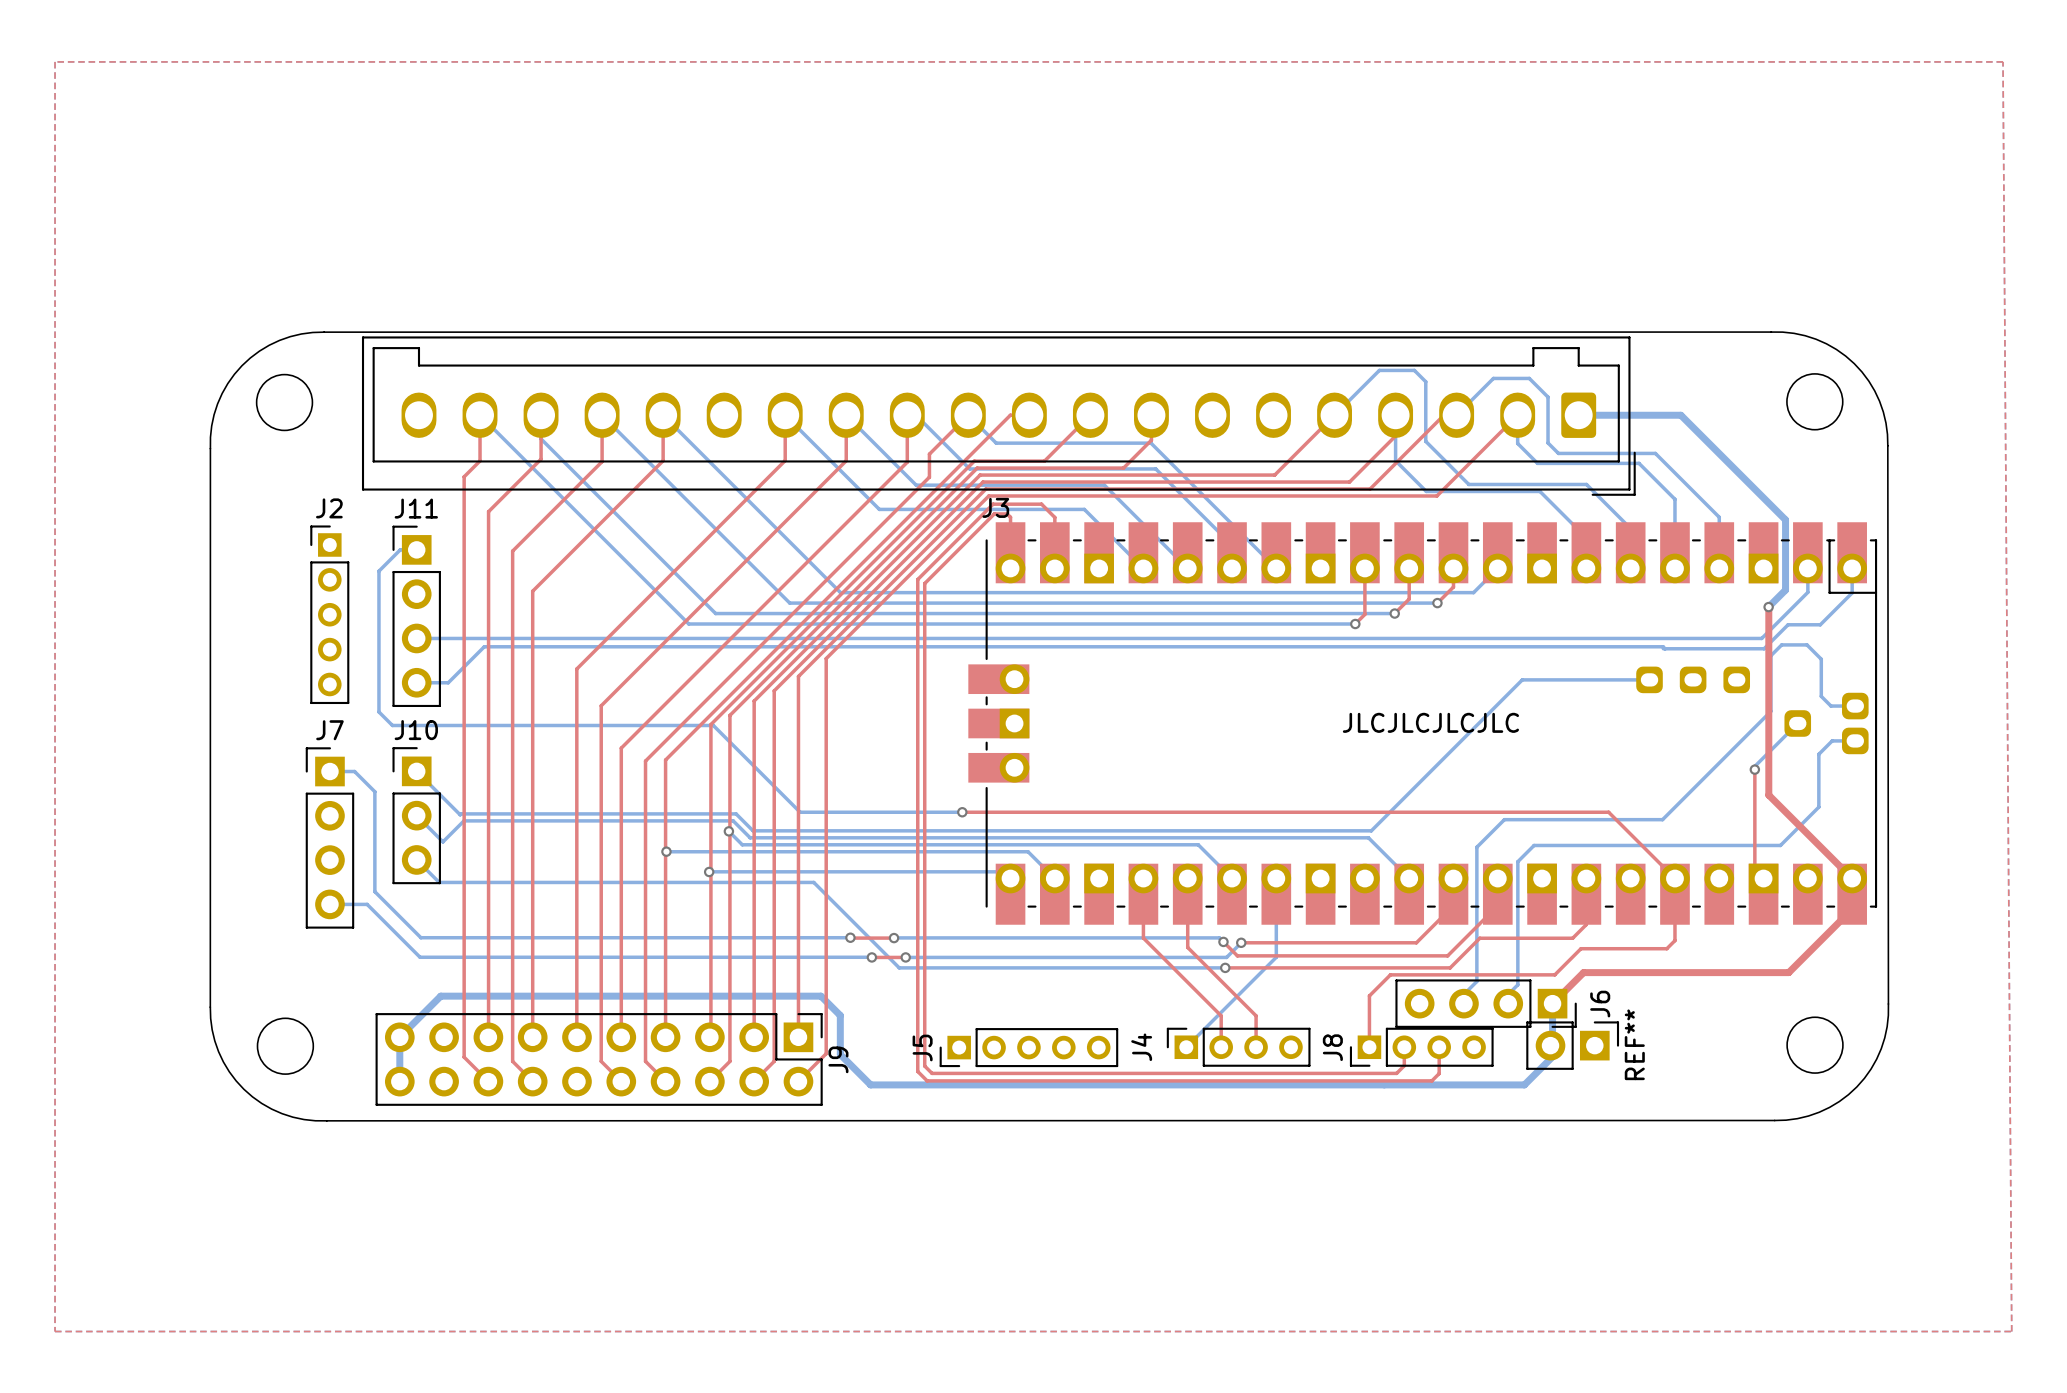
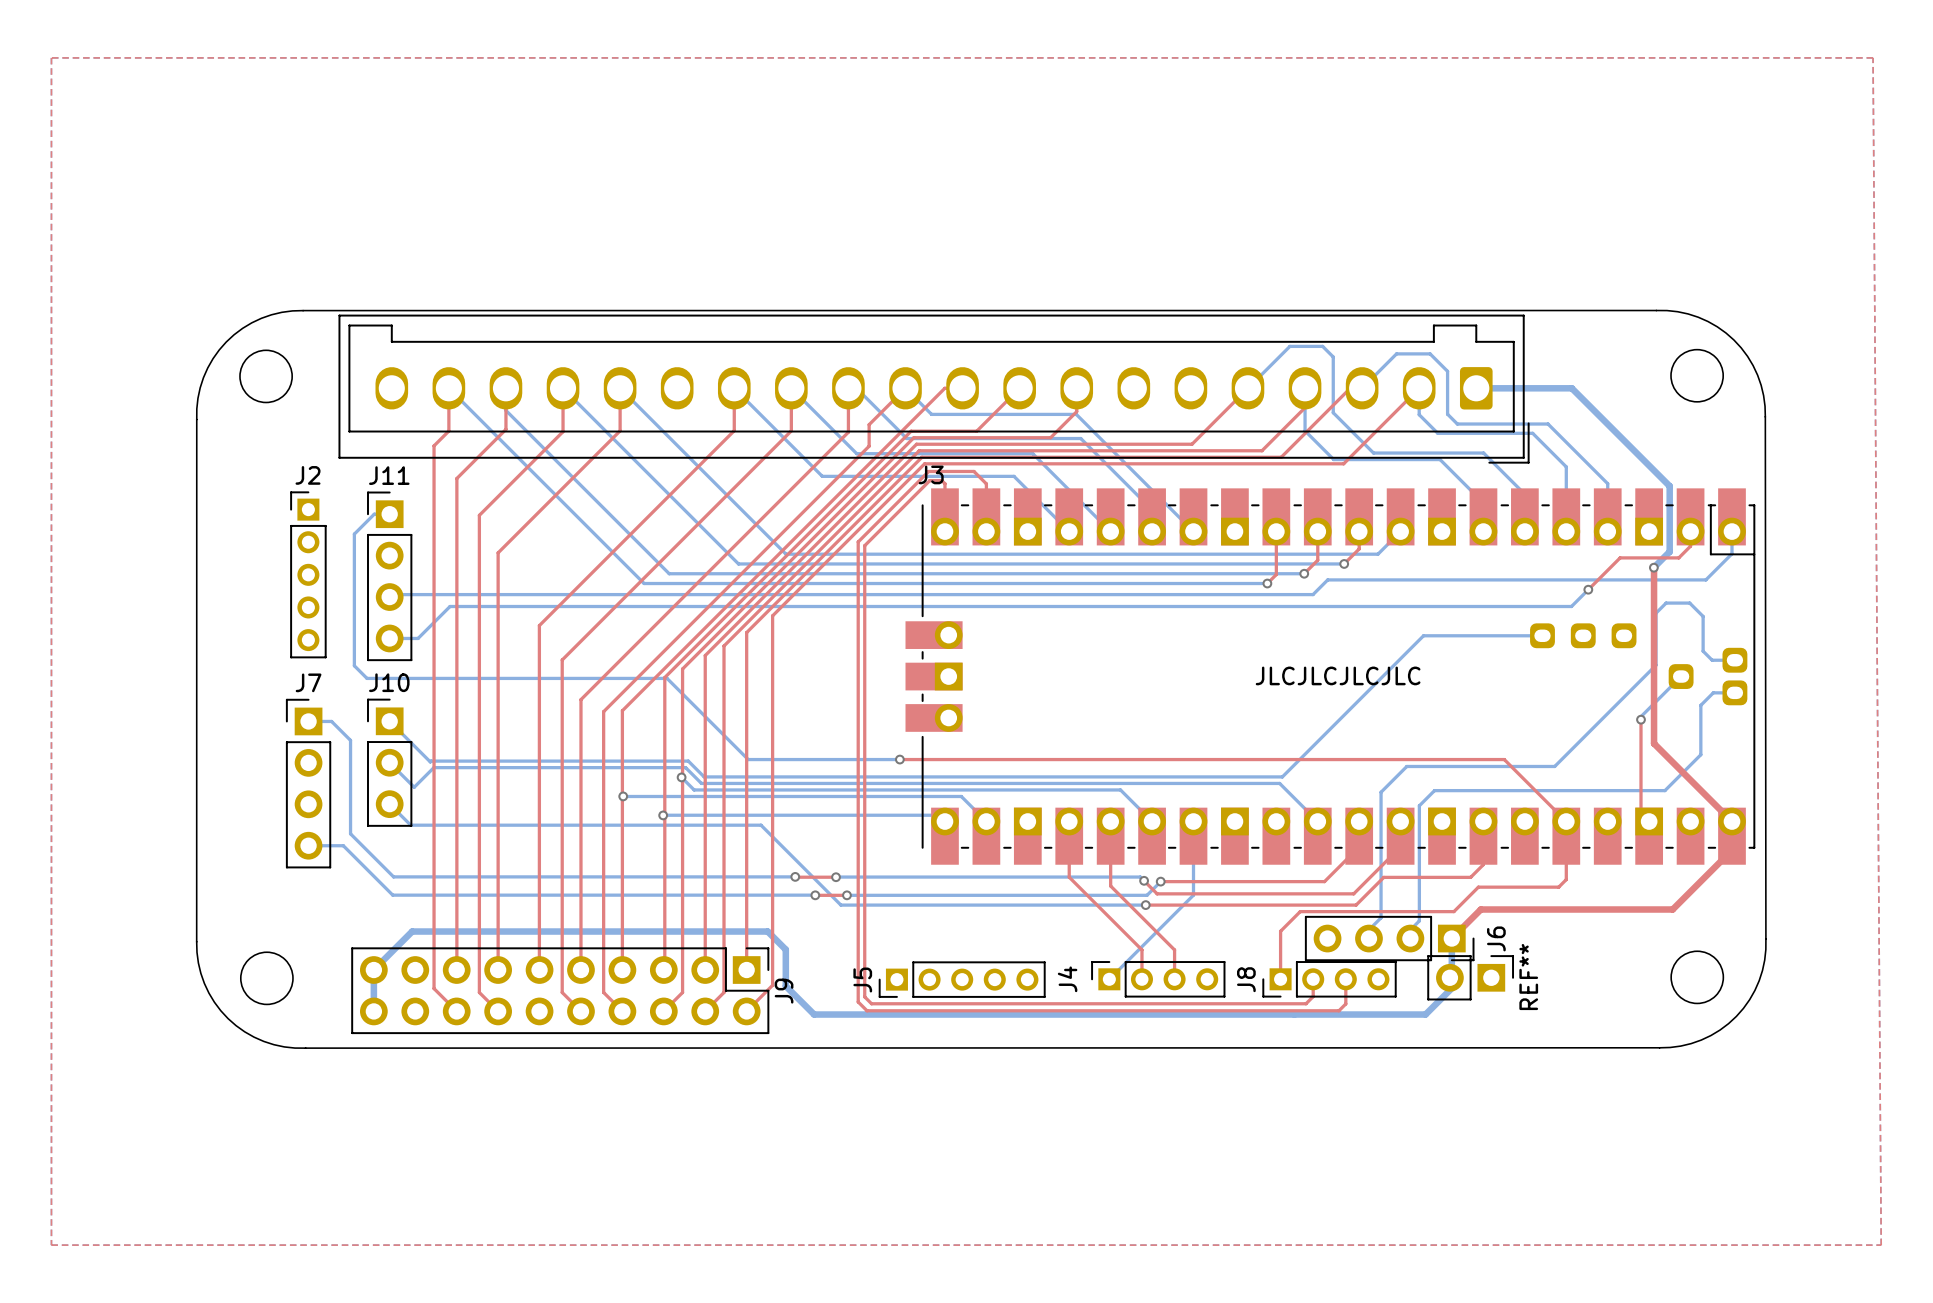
top track: none -> (1690, 531) (1690, 546) (1678, 557) (1620, 557) (1588, 589)
bottom track: (1807, 568) (1807, 592) (1761, 638) (416, 638) -> none
bottom track: (1852, 592) (1820, 624) (1788, 624) (1764, 648) (1663, 648) -> (1731, 553) (1705, 579) (1327, 579) (1313, 594) (392, 594)
via: none -> (1588, 589)
bottom track: (1665, 648) (1663, 646) (484, 646) (447, 682) -> (1588, 589) (1571, 606) (450, 606) (418, 638)

